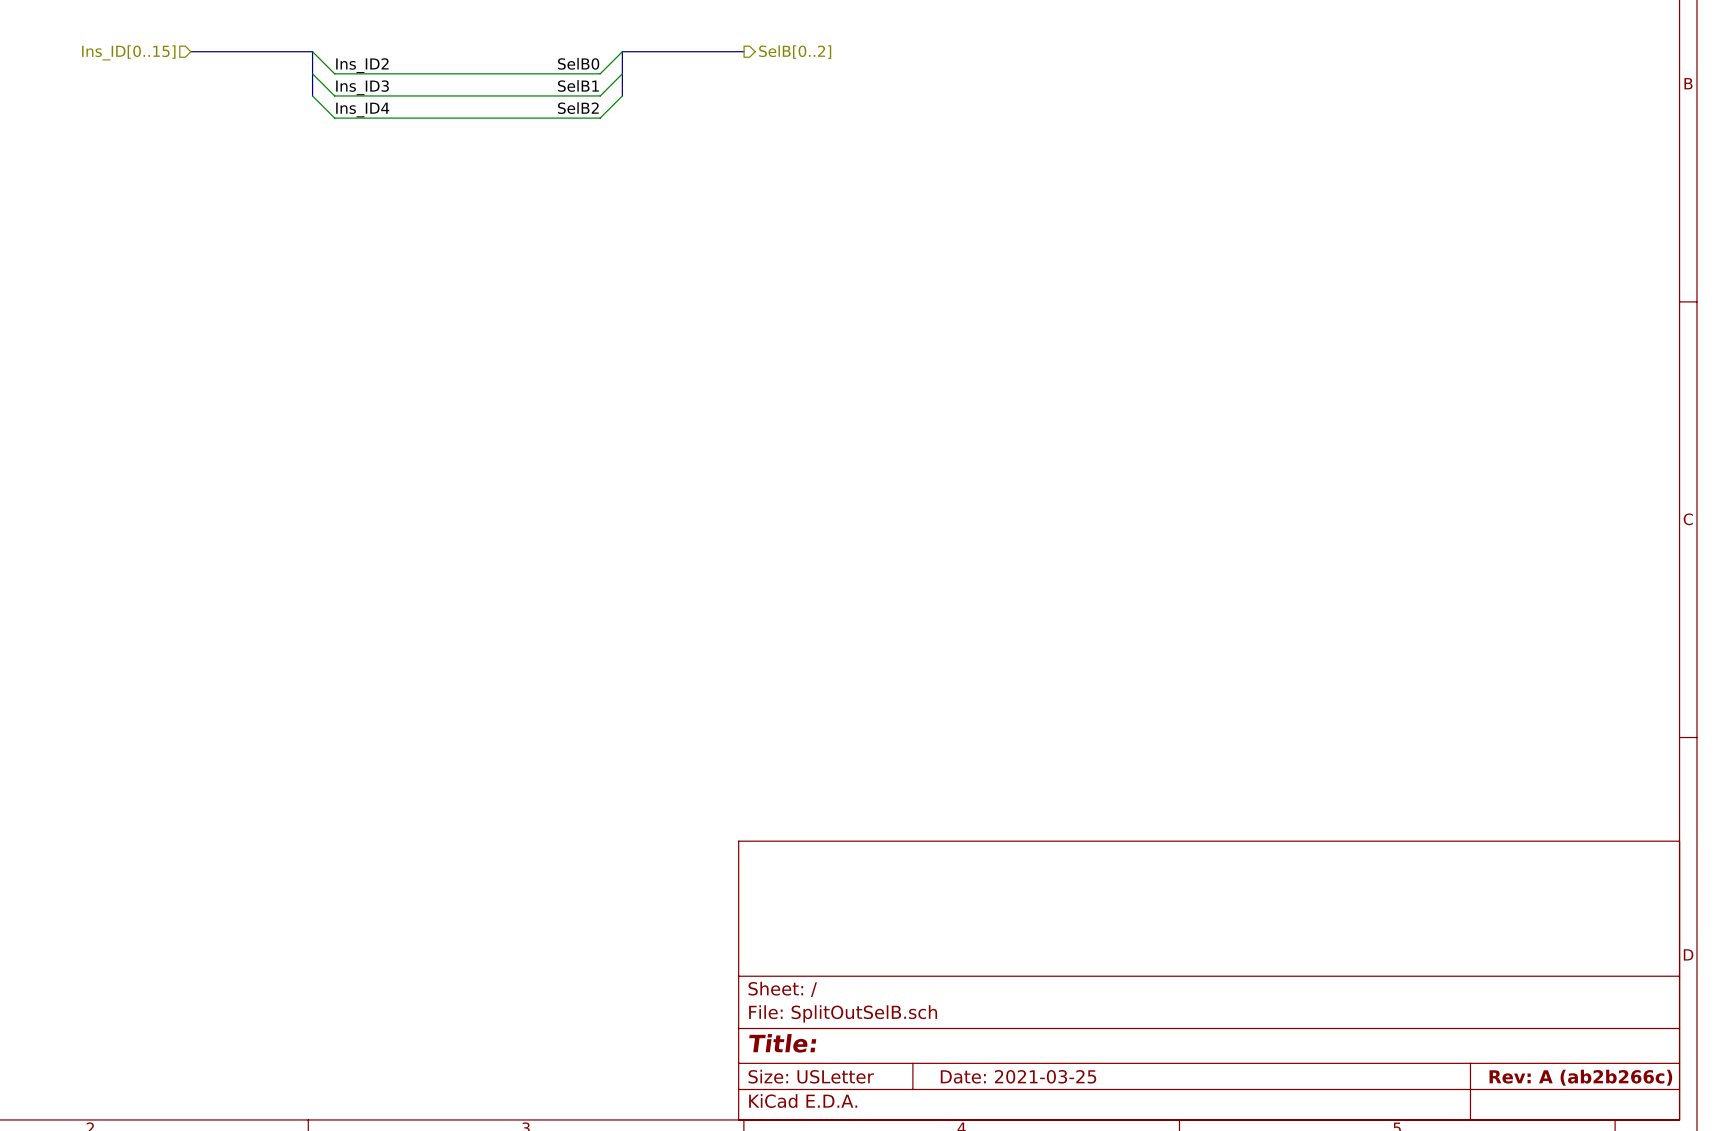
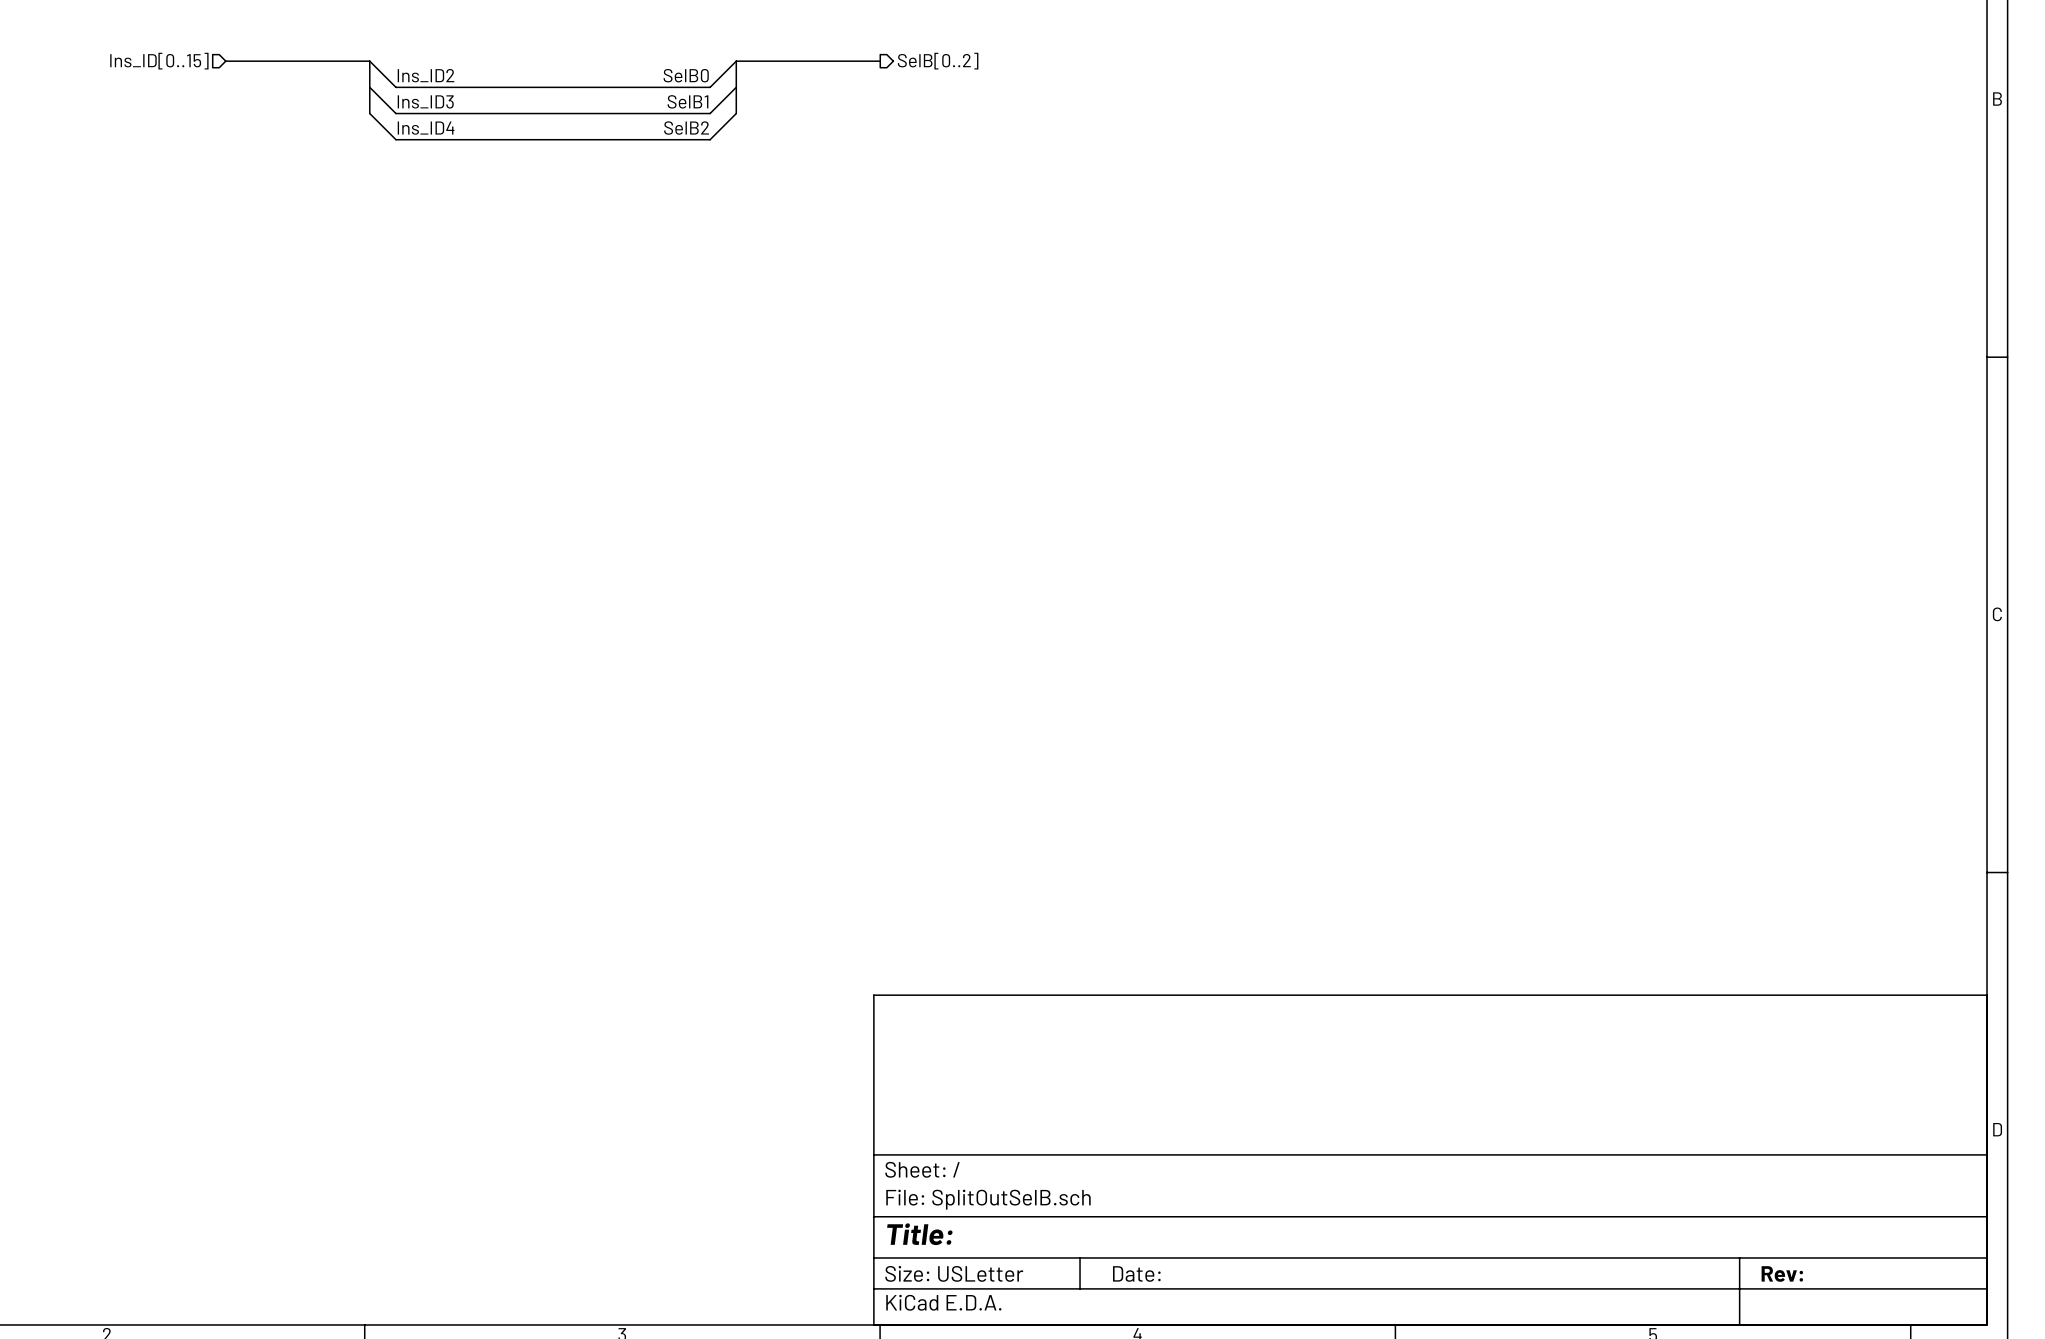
title block: Date: 2021-03-25 (1018, 1076) -> Date: (1136, 1274)
title block: Rev: A (ab2b266c) (1580, 1077) -> Rev: (1782, 1273)

